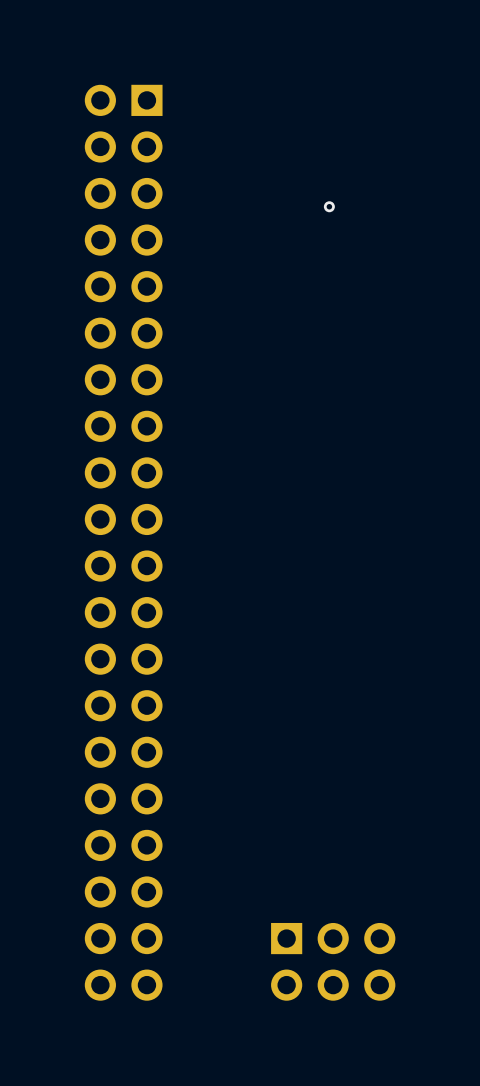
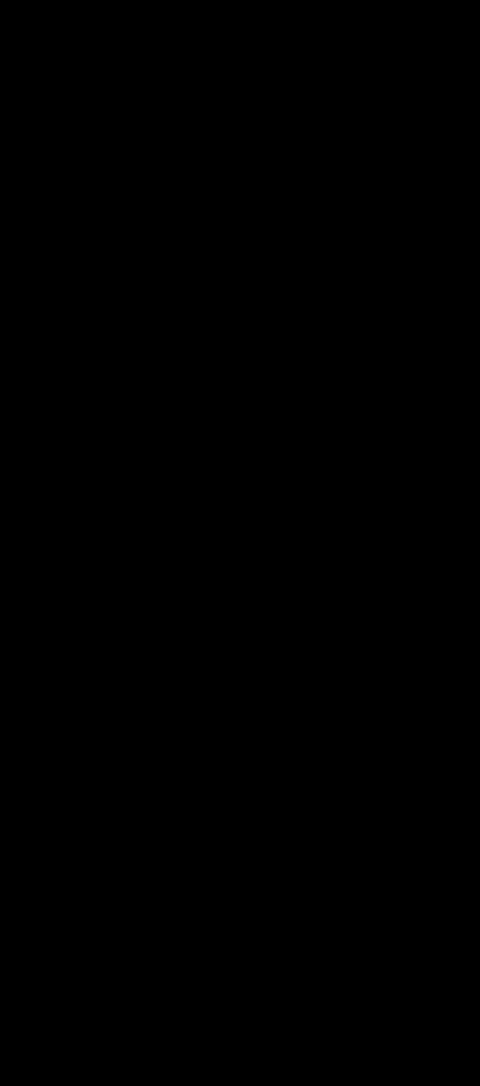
via: (329, 206) -> none
part: (123, 542) -> none
part: (333, 961) -> none

